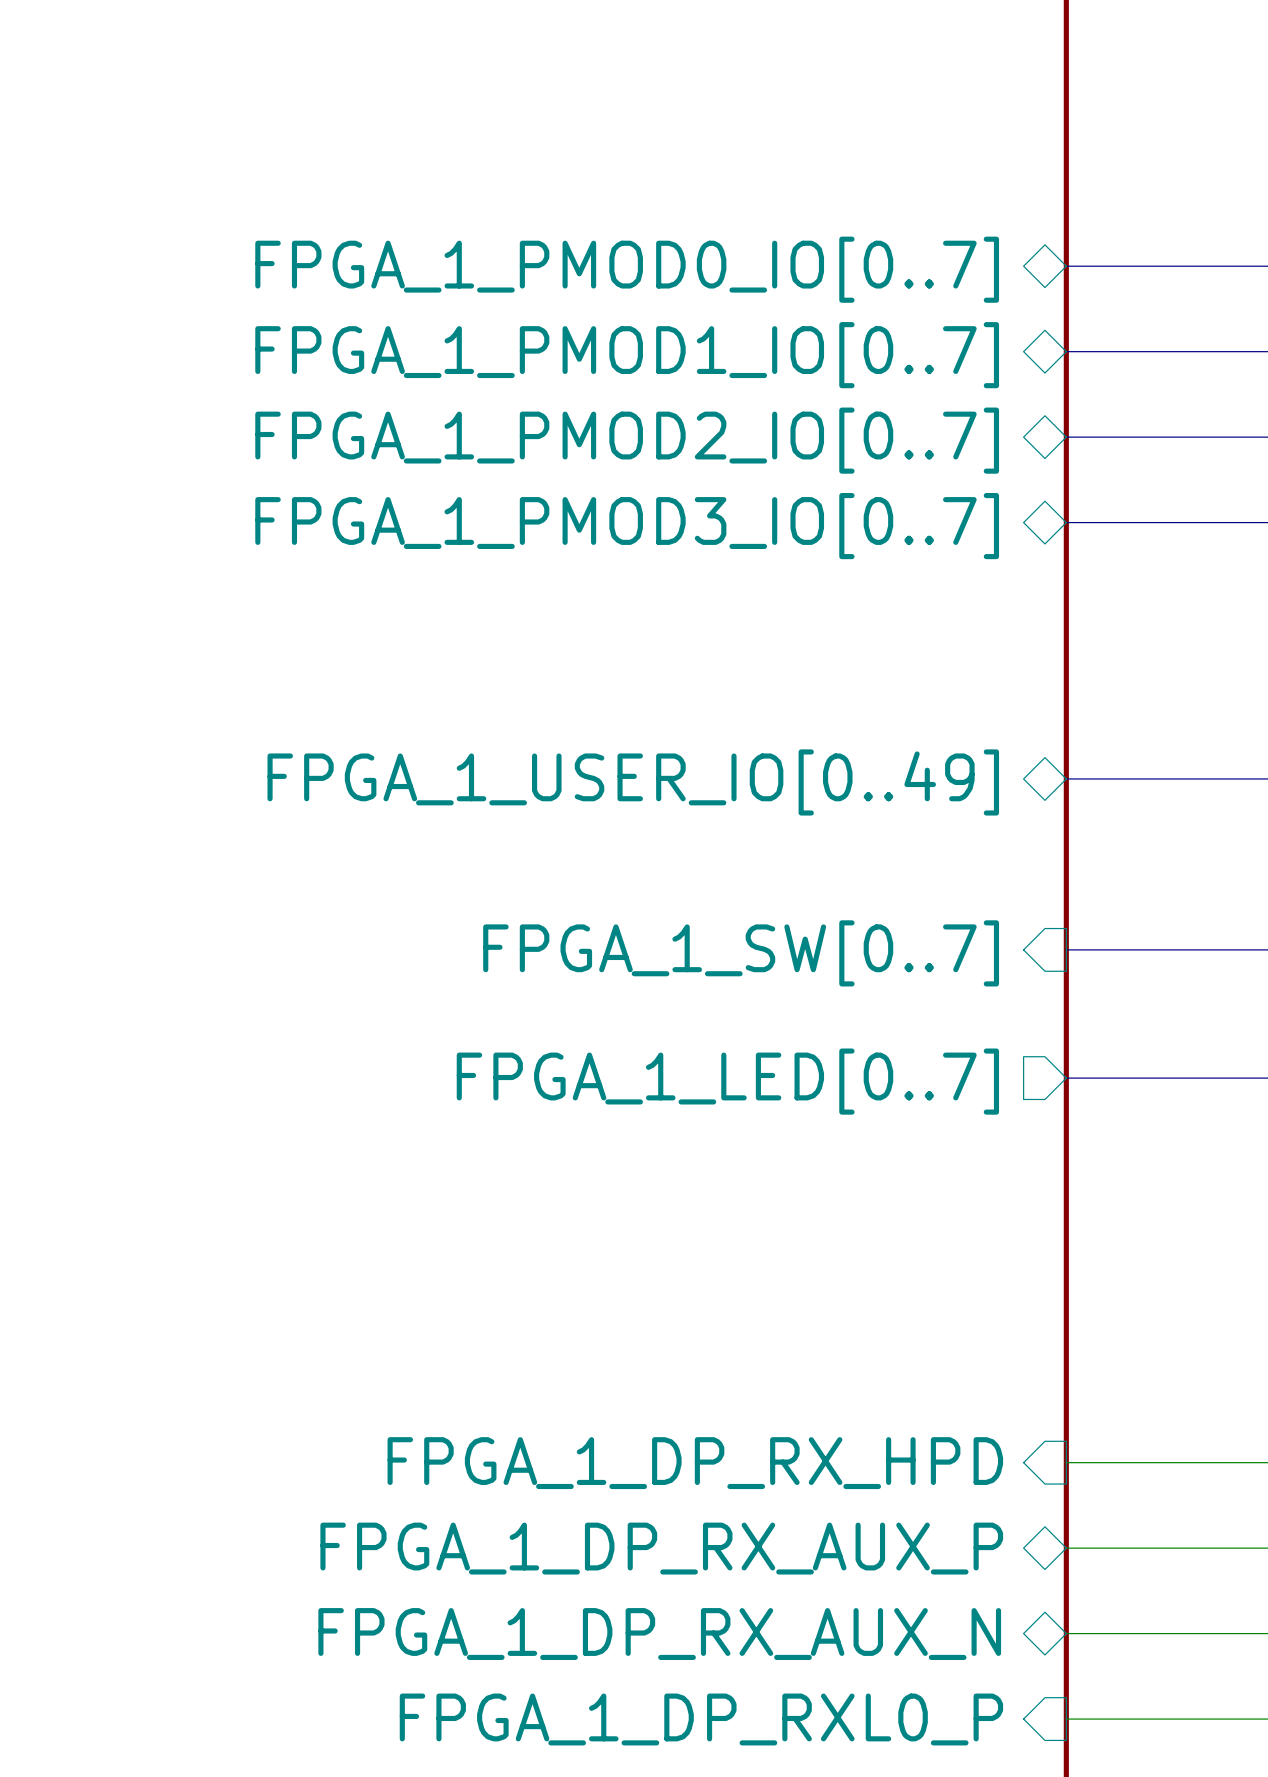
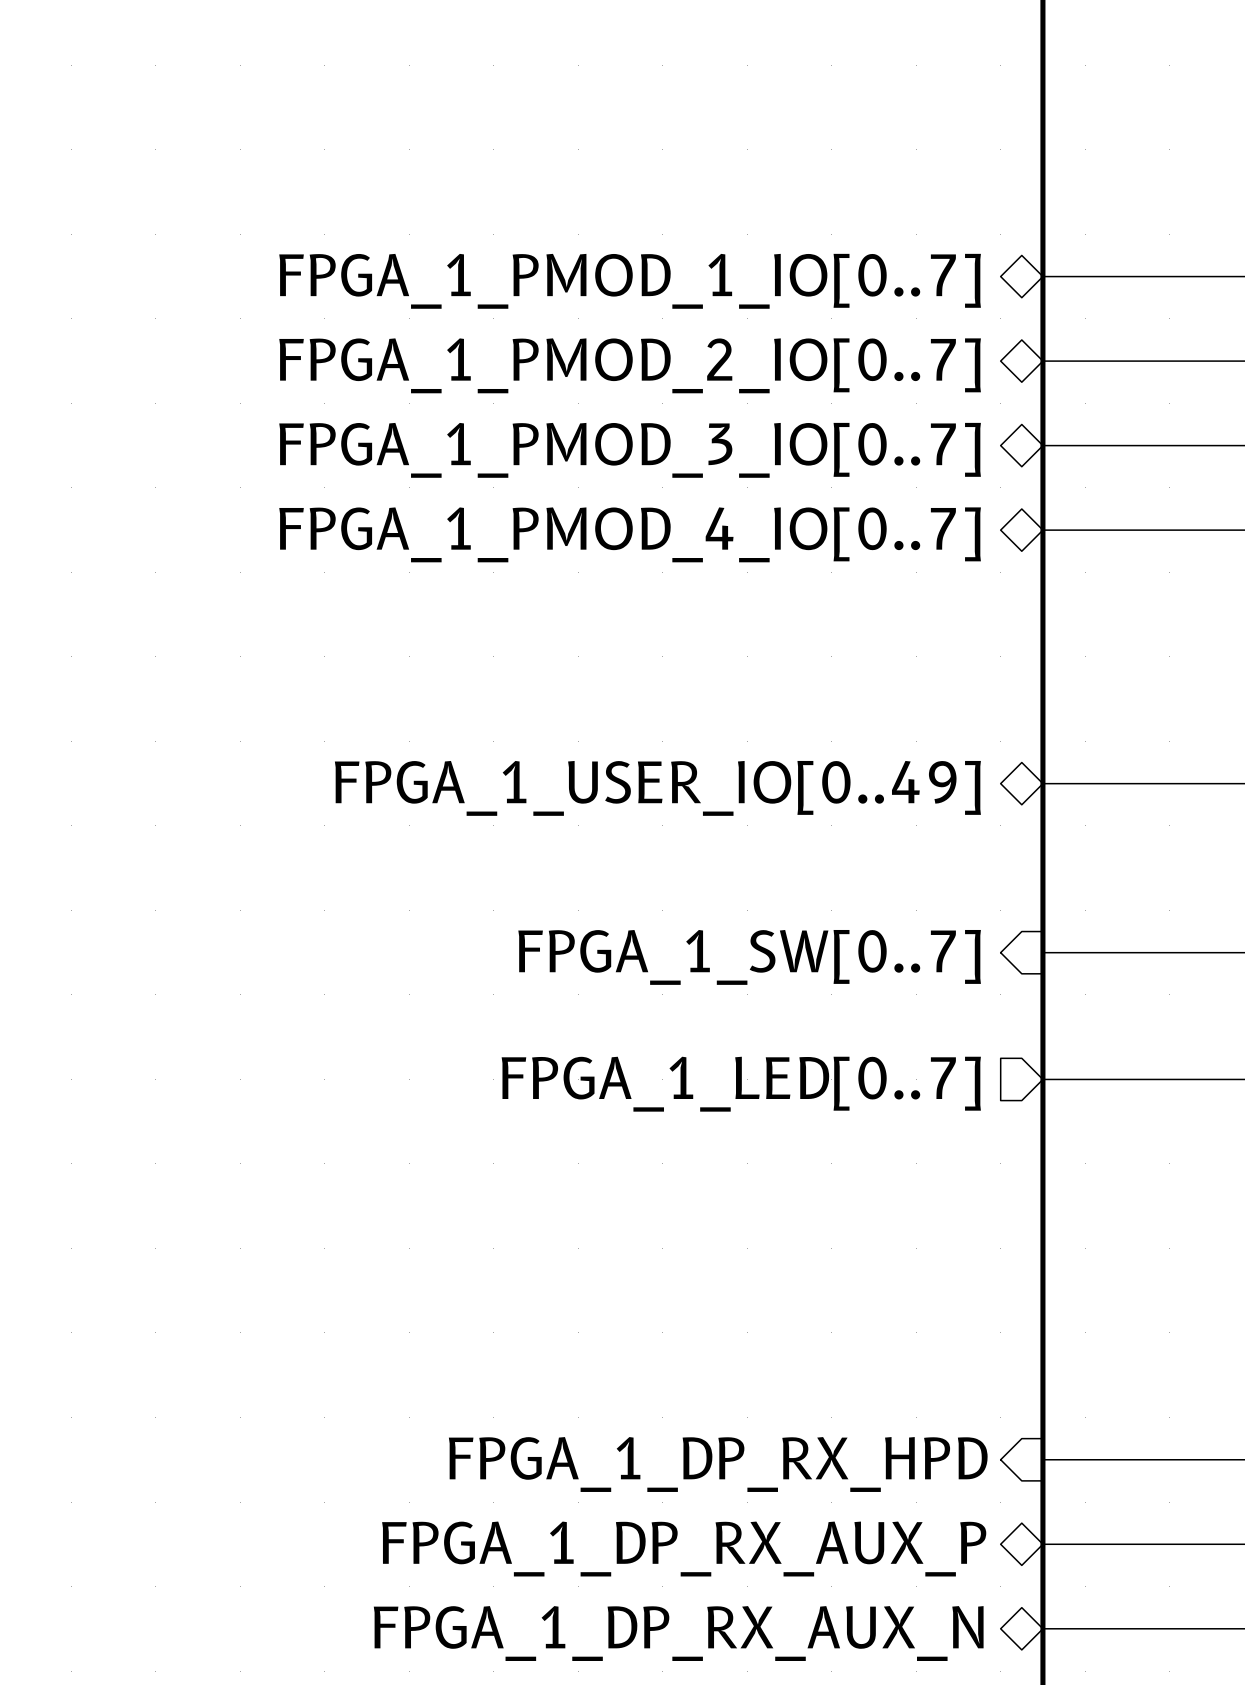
sheet pin: FPGA_1_PMOD0_IO[0..7] (627, 269) -> FPGA_1_PMOD_1_IO[0..7] (630, 281)
sheet pin: FPGA_1_PMOD1_IO[0..7] (627, 355) -> FPGA_1_PMOD_2_IO[0..7] (630, 365)
sheet pin: FPGA_1_PMOD2_IO[0..7] (627, 440) -> FPGA_1_PMOD_3_IO[0..7] (630, 450)
sheet pin: FPGA_1_PMOD3_IO[0..7] (627, 526) -> FPGA_1_PMOD_4_IO[0..7] (630, 534)

